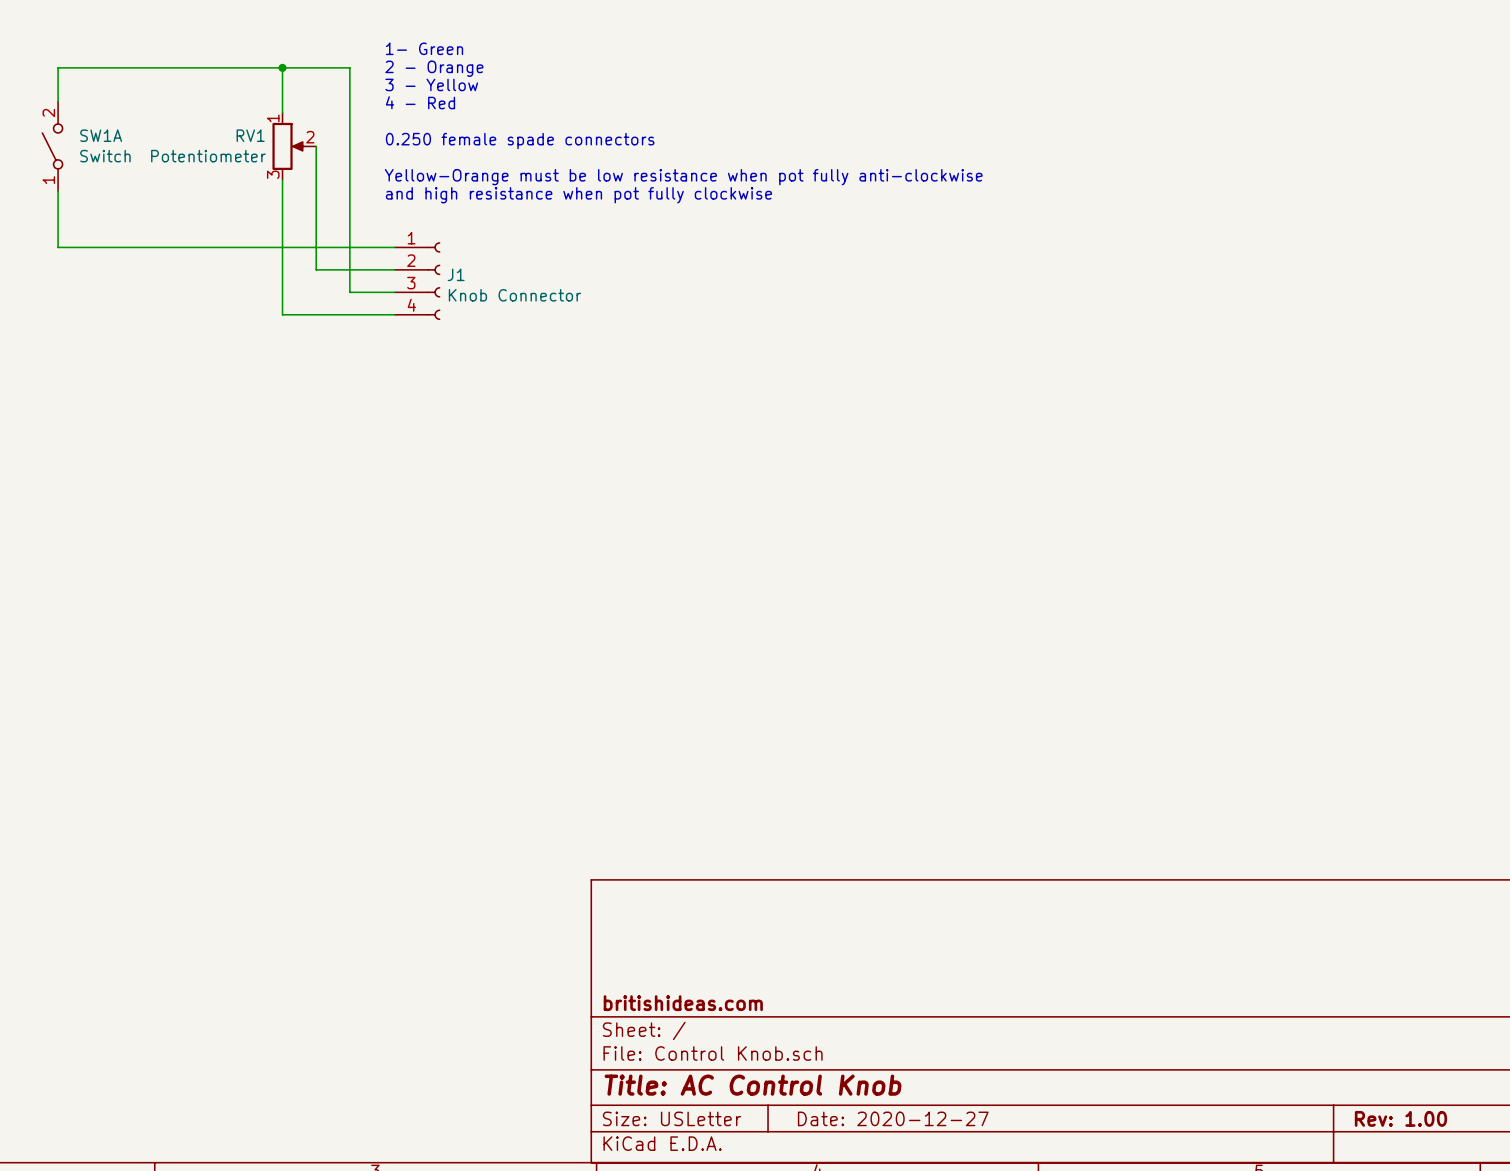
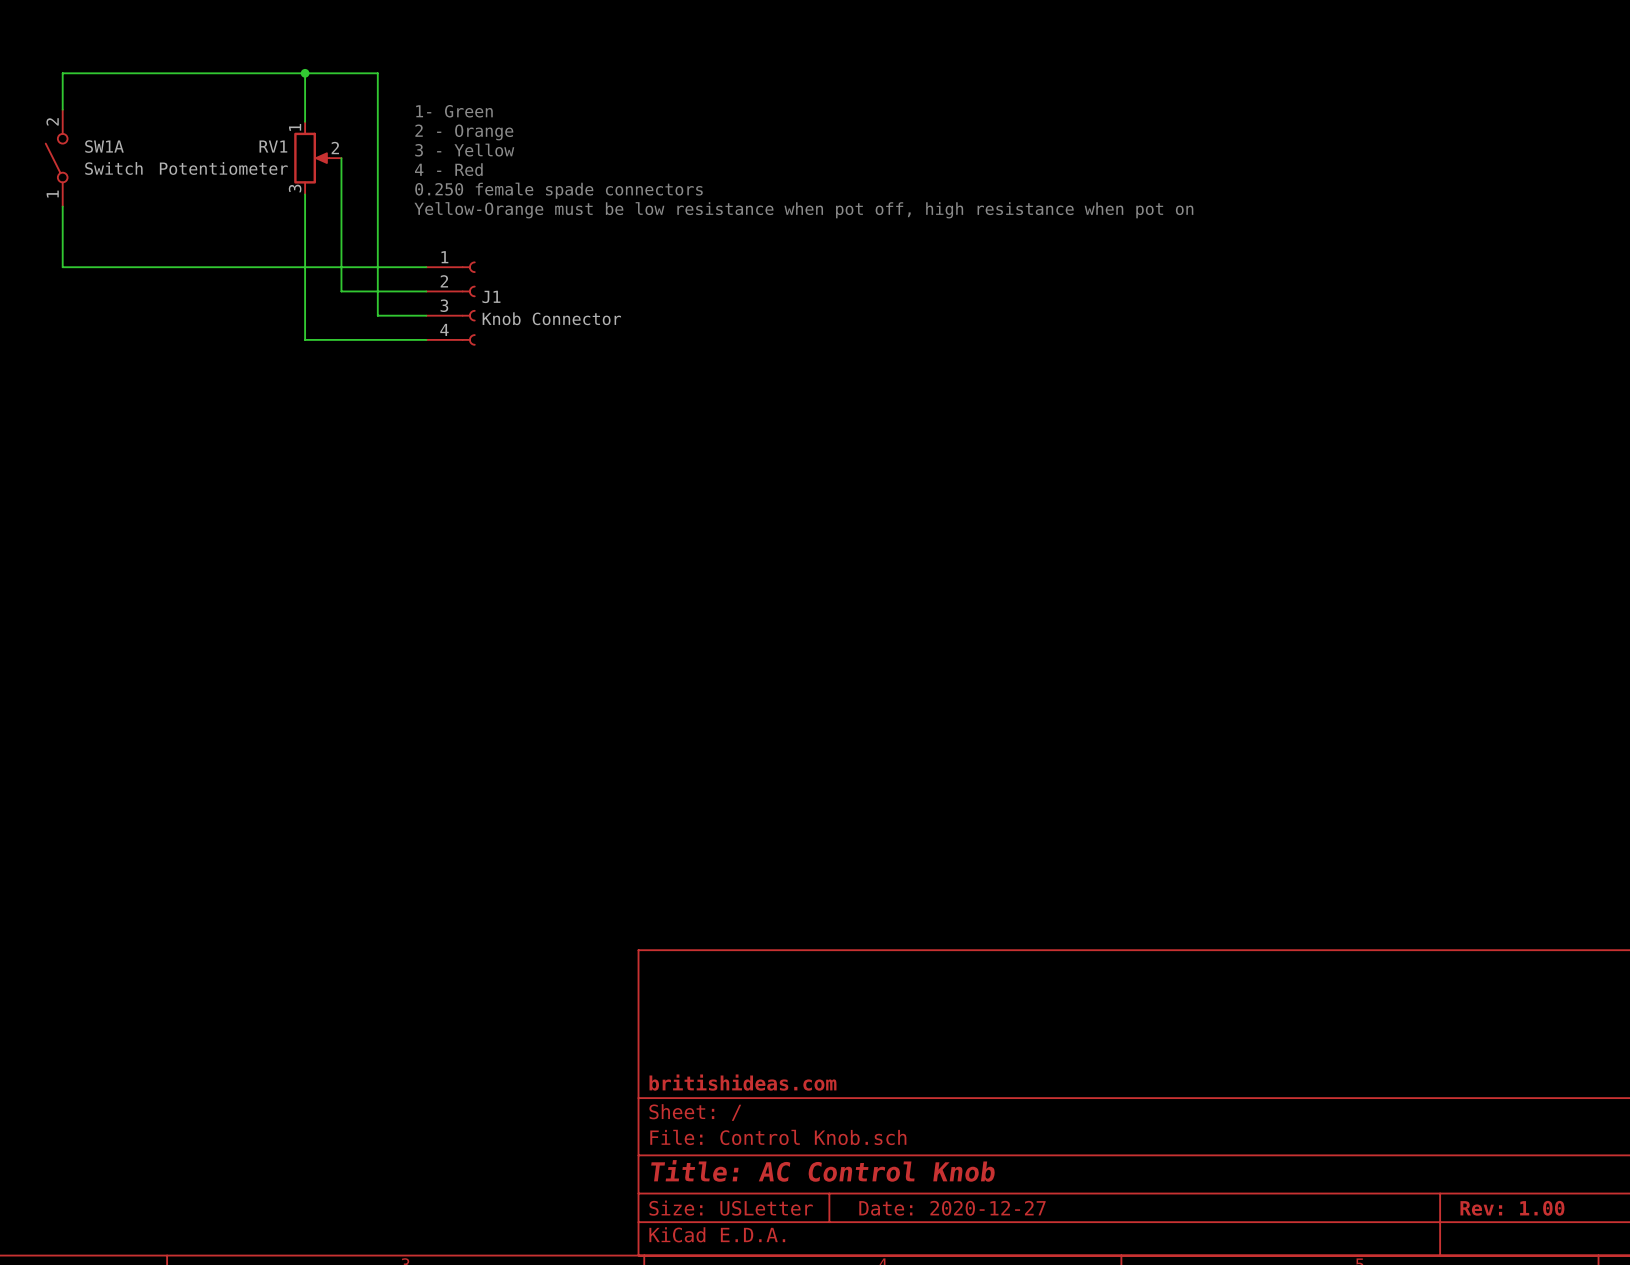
text: 1- Green (424, 48) -> none
text position: 2 - Orange (434, 68) -> 2 - Orange (464, 132)
text: 3 - Yellow (431, 84) -> none
text: 4 - Red (420, 102) -> 1- Green (454, 111)
text: 0.250 female spade connectors (520, 141) -> 3 - Yellow (464, 150)
text: none -> 4 - Red (448, 169)
text: Yellow-Orange must be low resistance when pot fully anti-clockwise (683, 177) -> 0.250 female spade connectors (559, 190)
text: and high resistance when pot fully clockwise (578, 195) -> Yellow-Orange must be low resistance when pot off, high resistance when pot on (803, 210)

